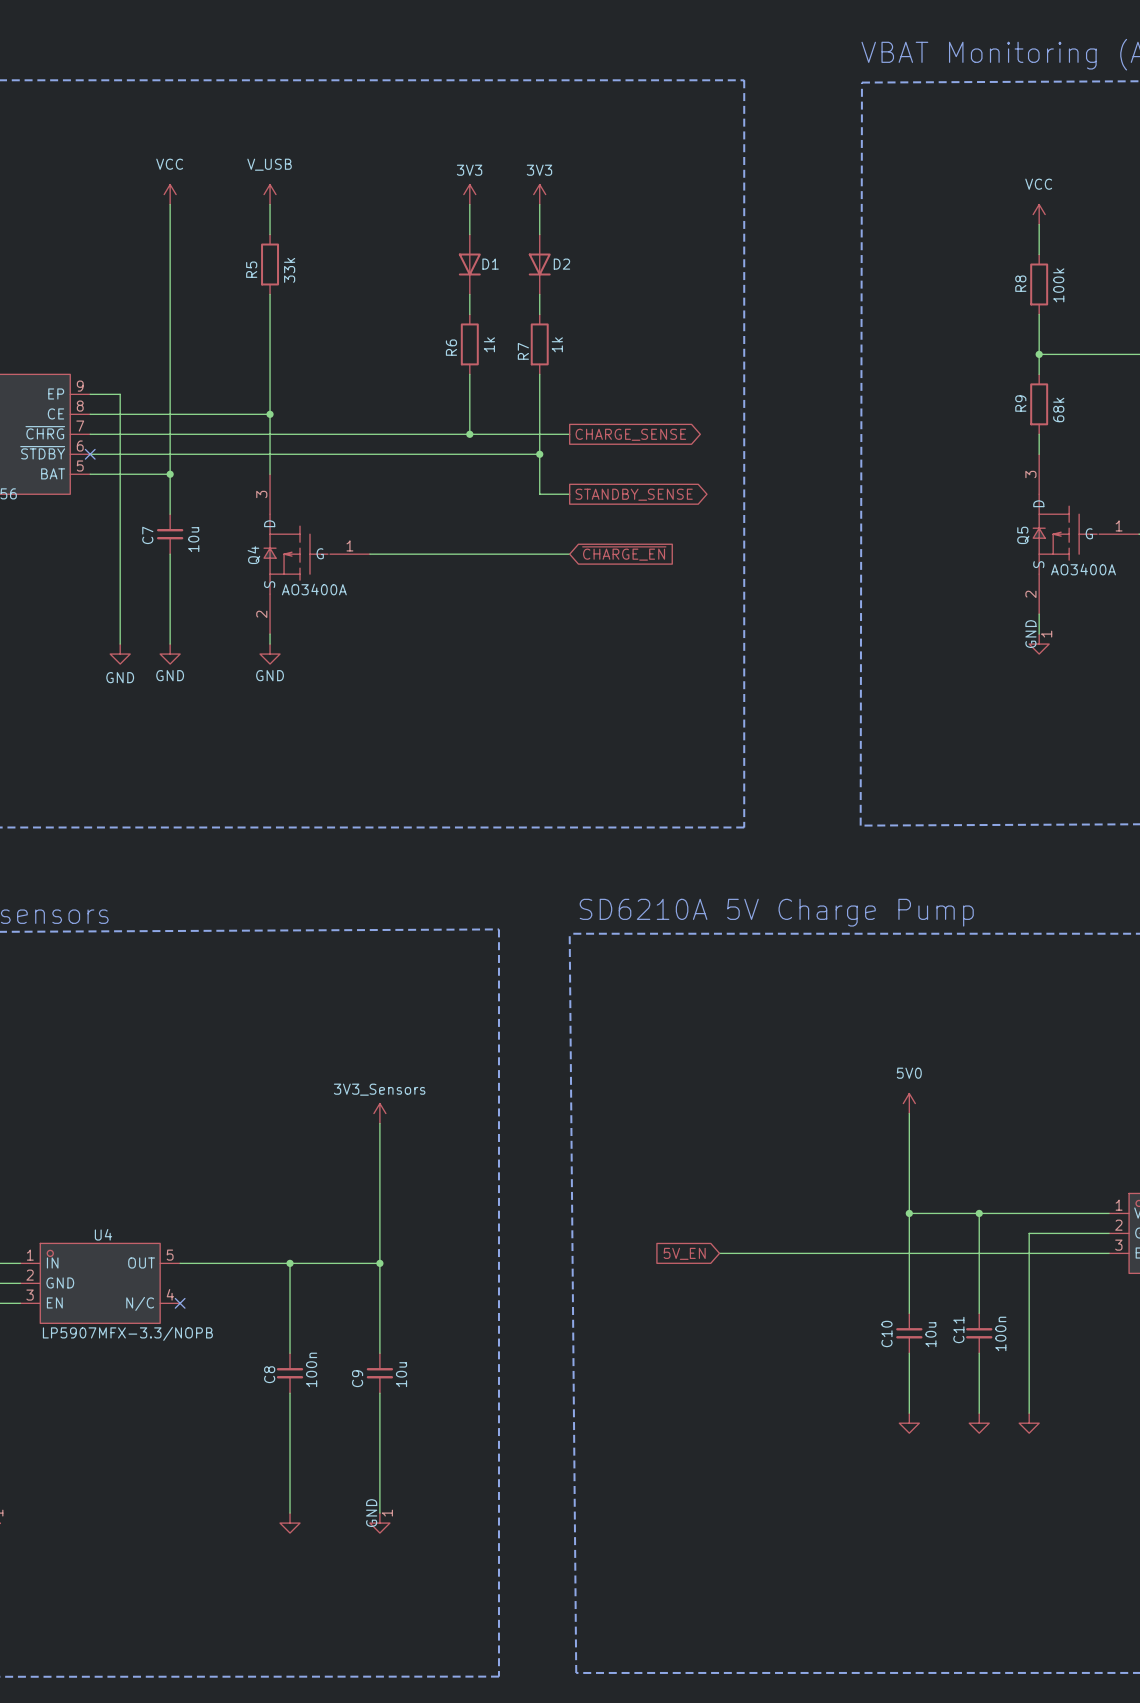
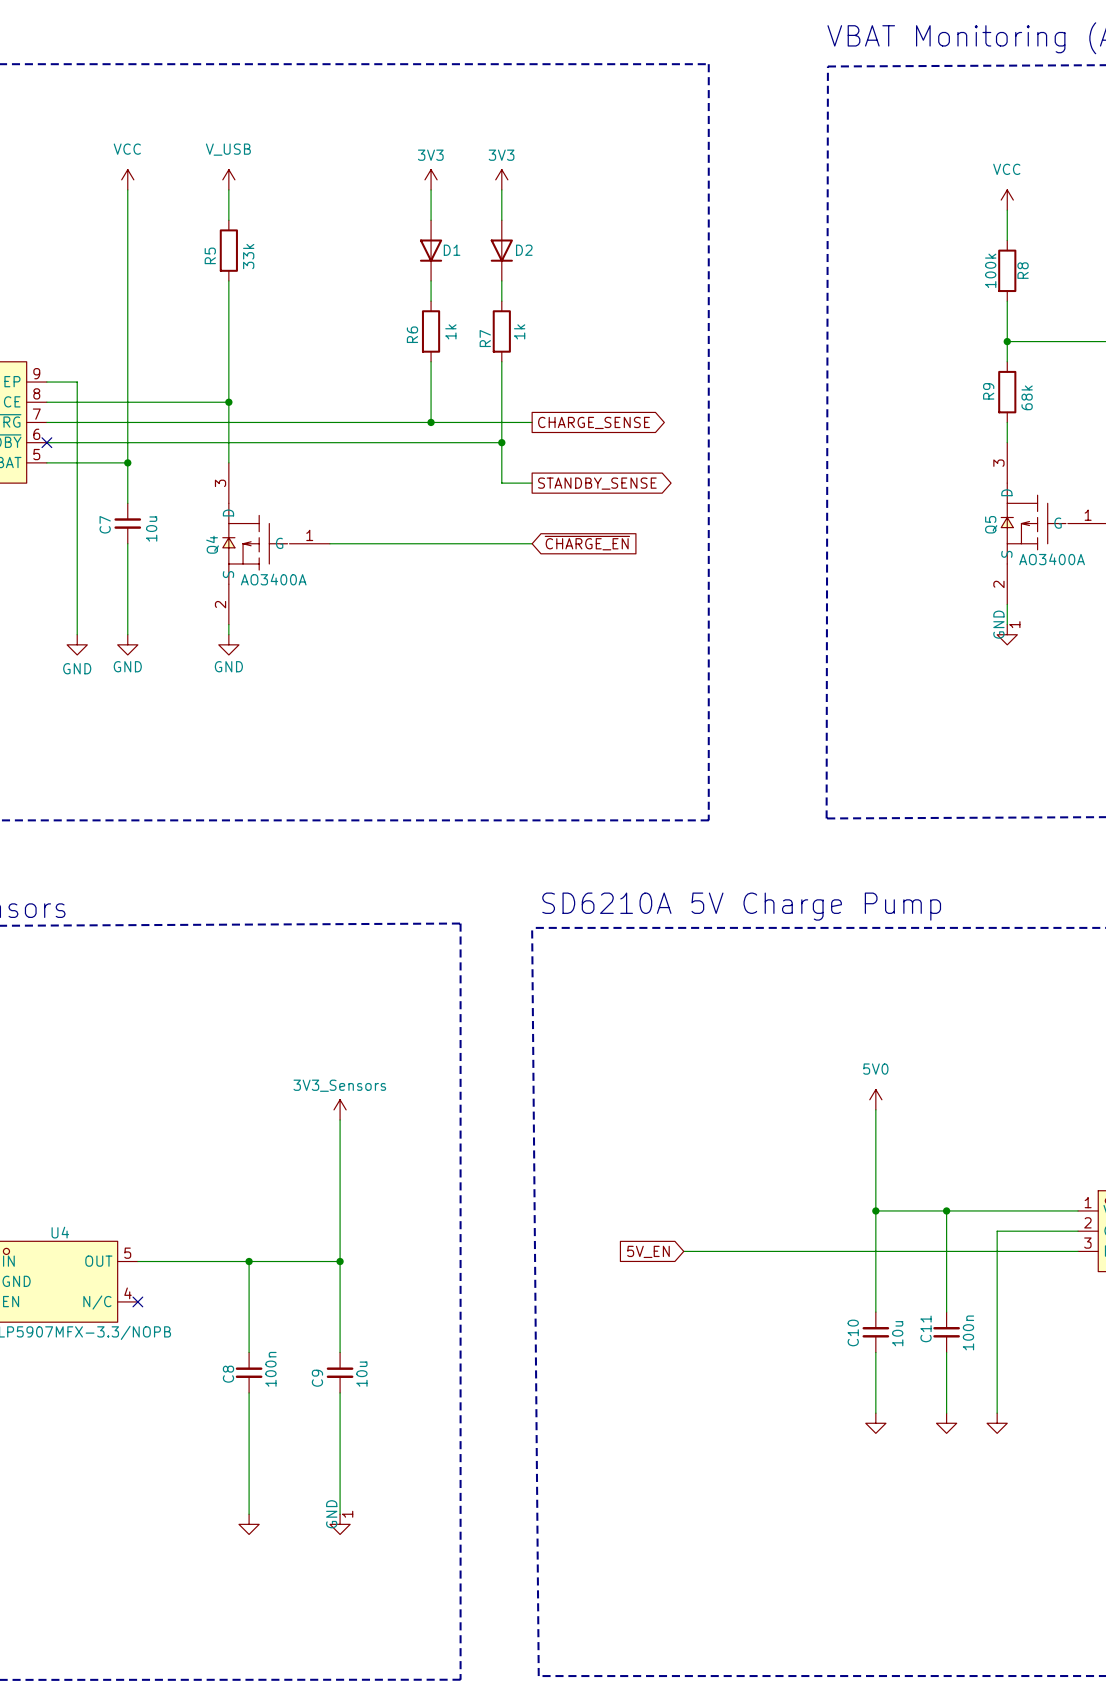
R8 name position: R8 (1020, 283) -> R8 (1023, 270)
R8 value position: 100k (1058, 285) -> 100k (990, 270)

